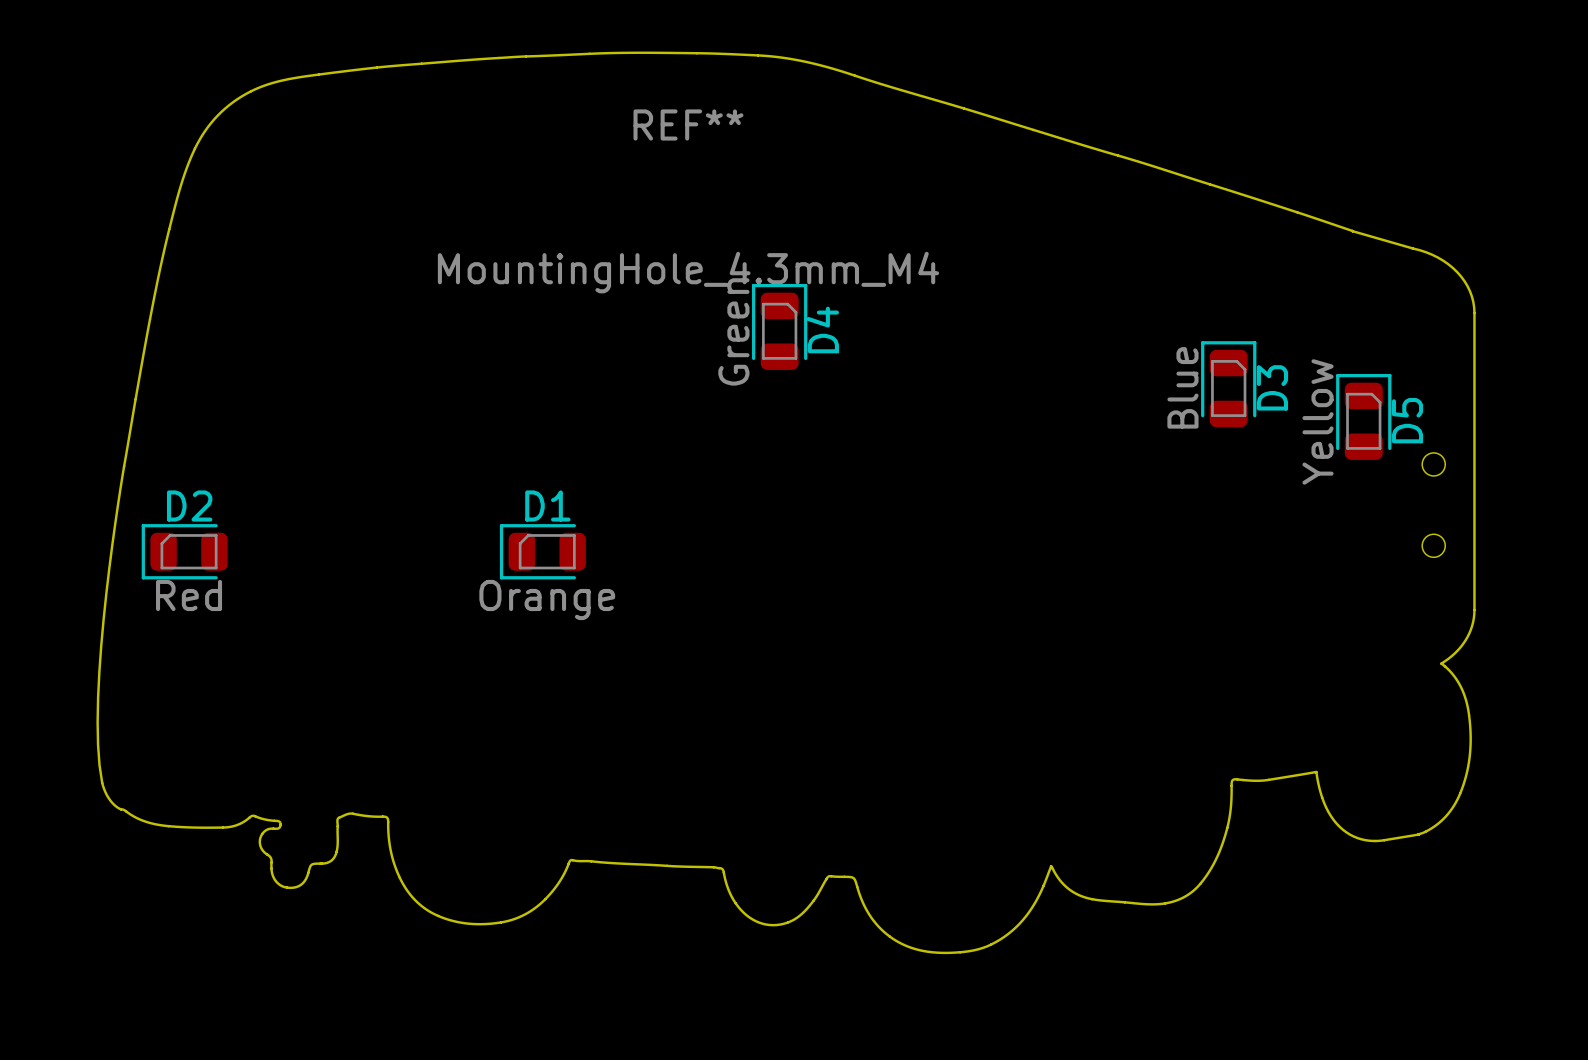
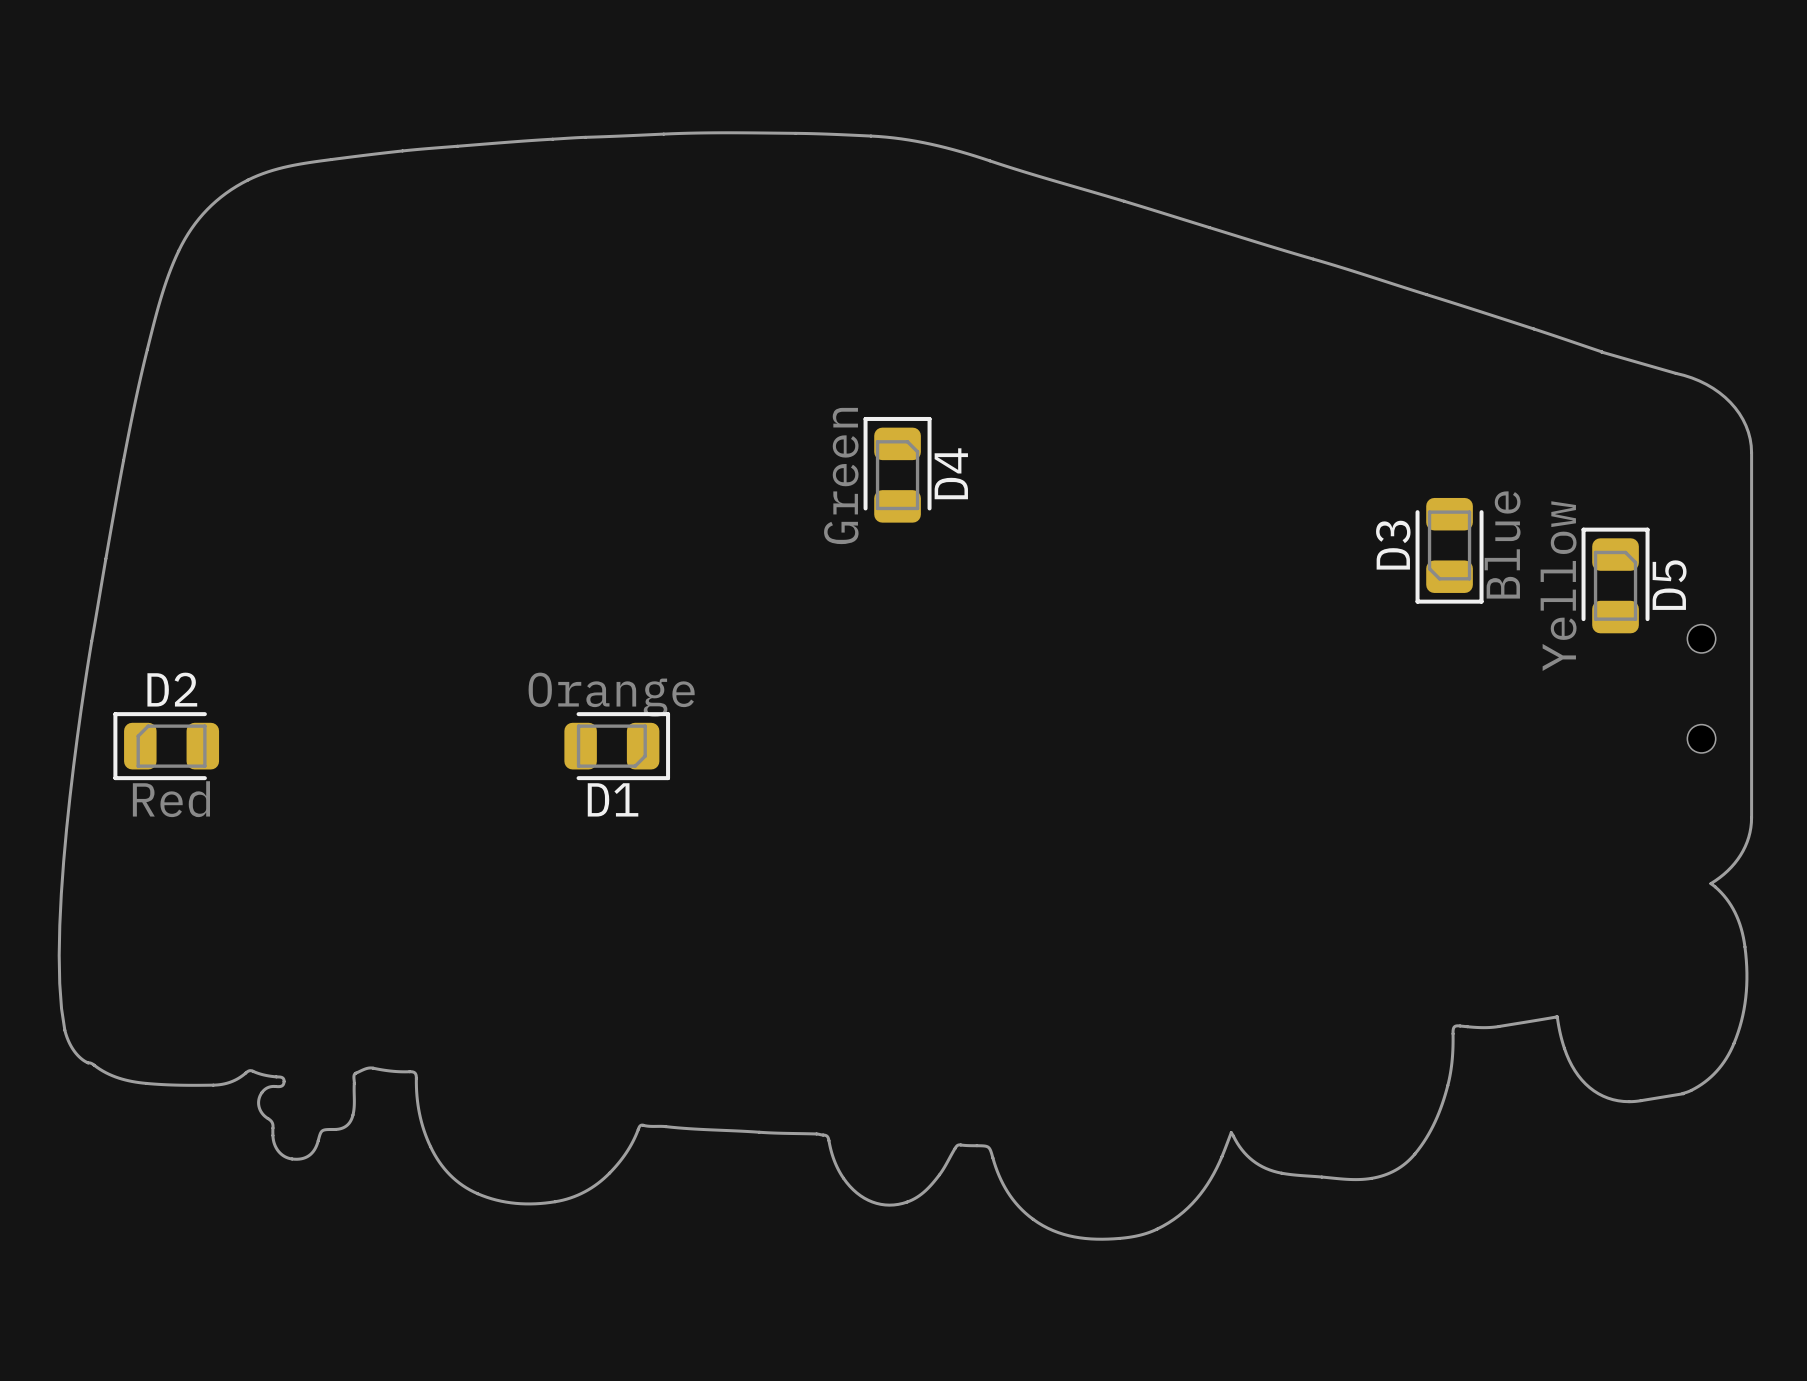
REF**: MountingHole_4.3mm_M4 (688, 201) -> none
D3 rotation: 0° (1228, 384) -> 180° (1449, 550)
D1 rotation: 0° (542, 551) -> 180° (617, 746)

